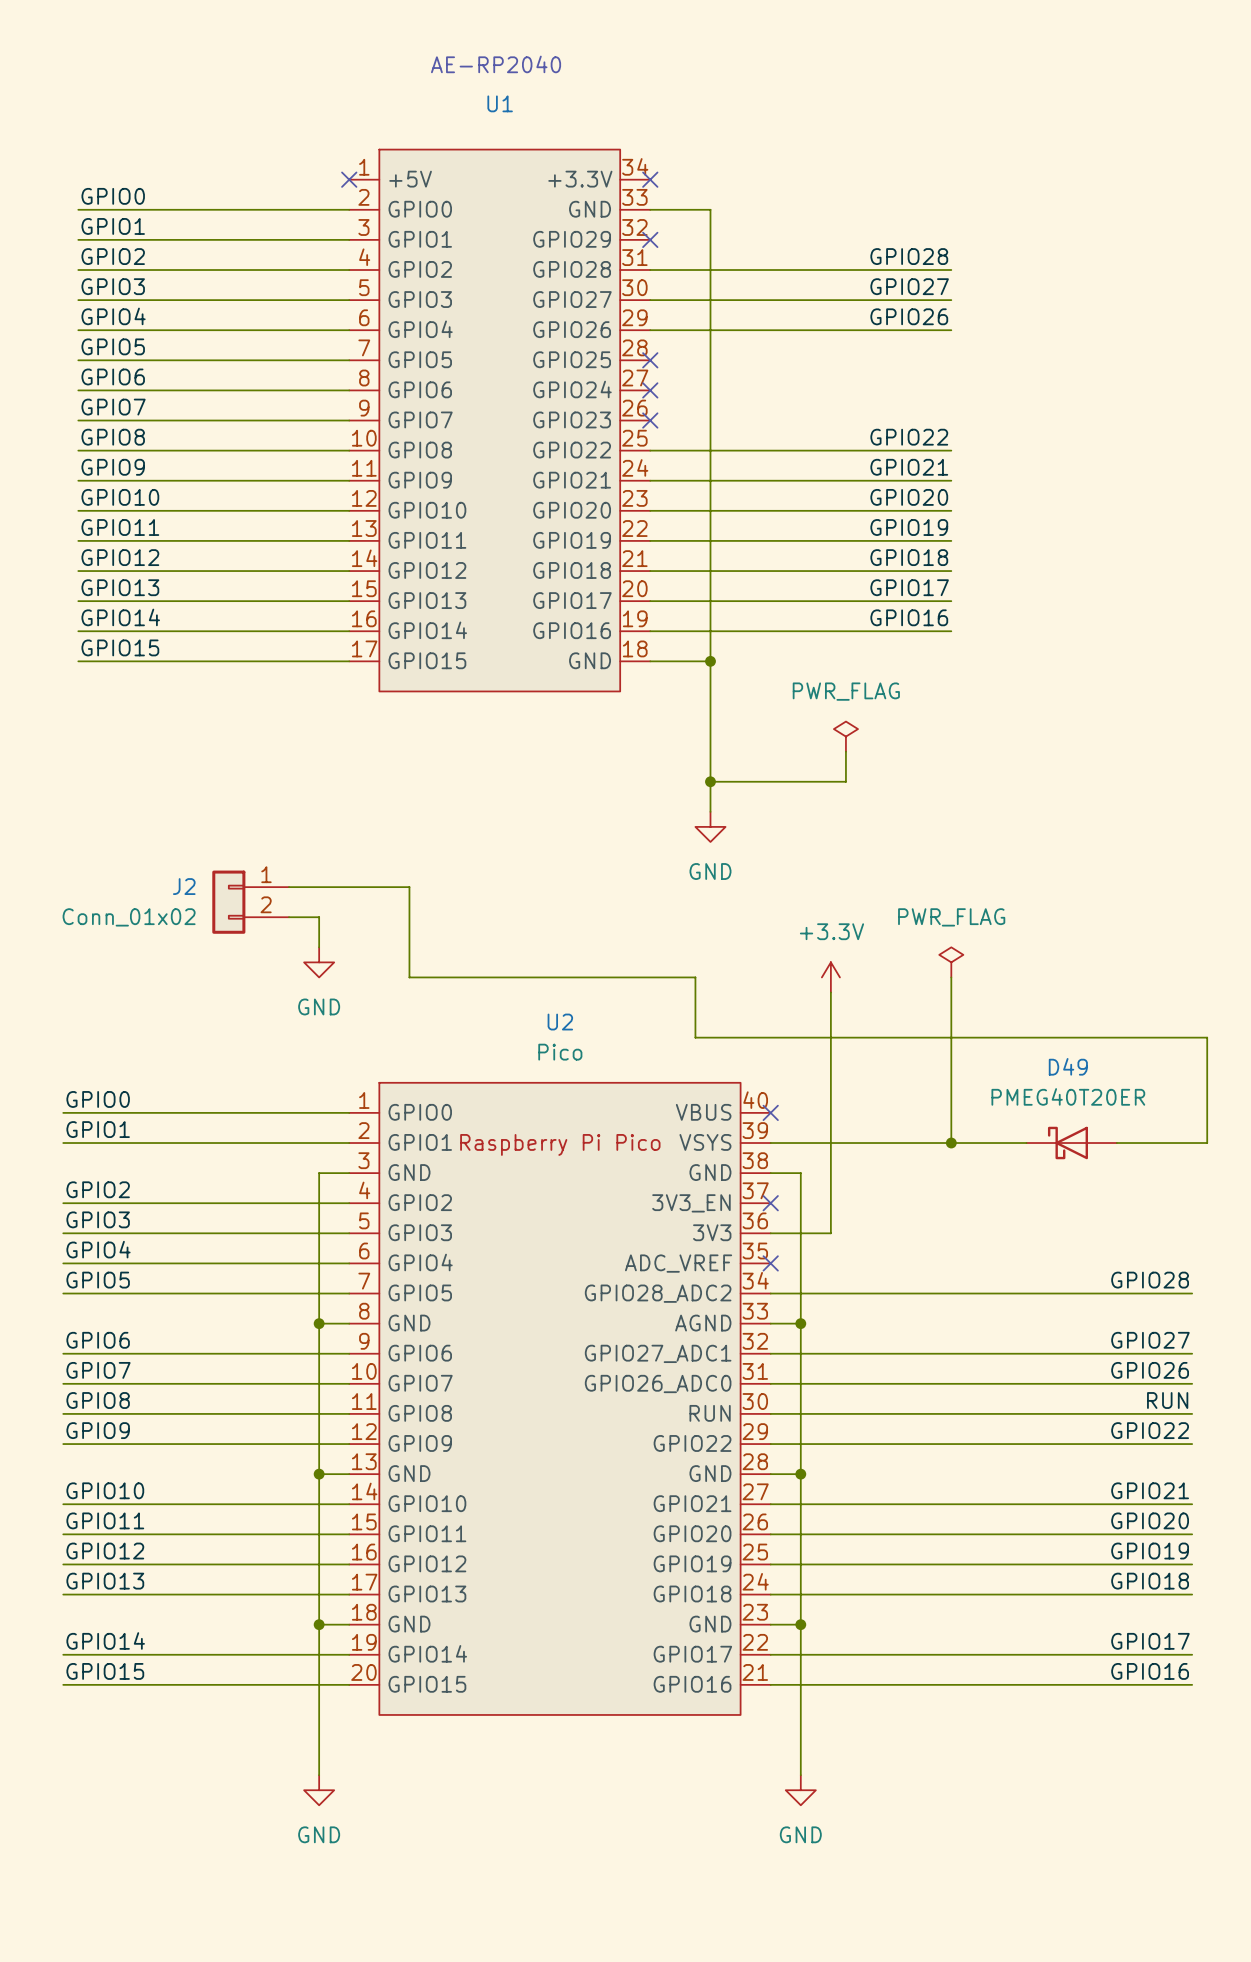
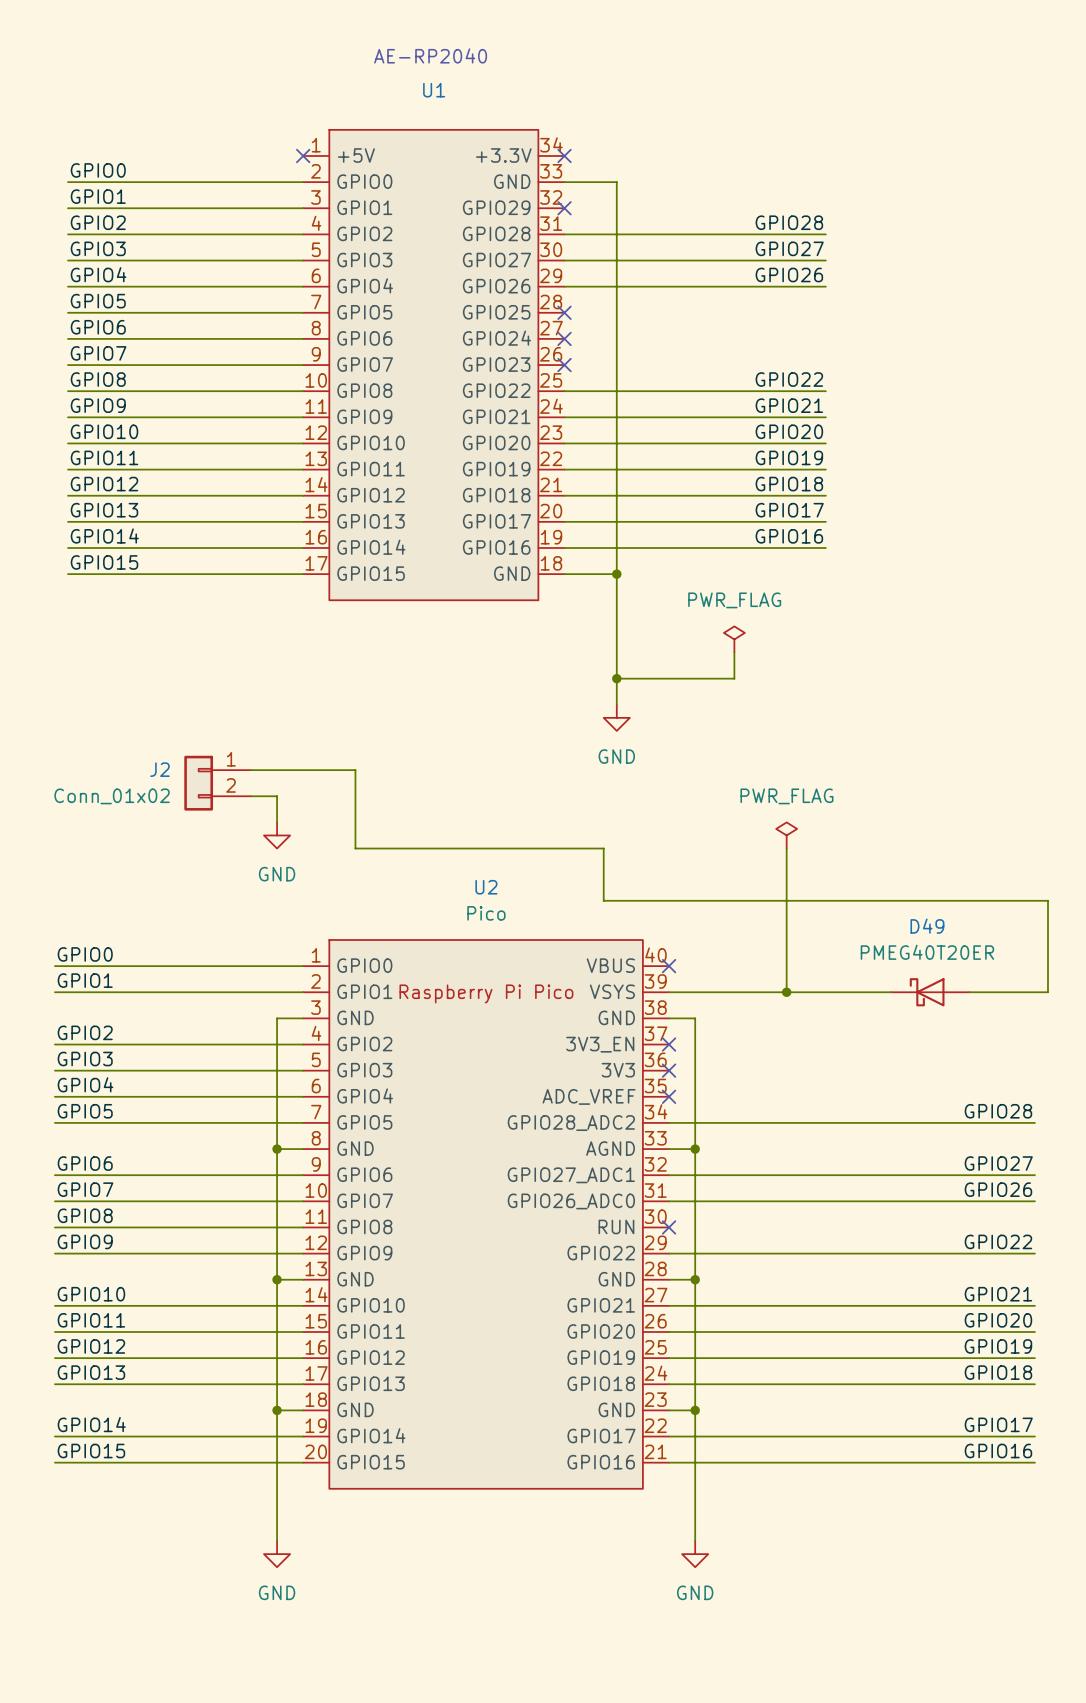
power symbol position: PWR_FLAG (951, 962) -> PWR_FLAG (786, 835)
power symbol: +3.3V (830, 977) -> none
wire: (951, 977) (951, 1143) -> (786, 848) (786, 992)
wire: (830, 992) (830, 1233) (770, 1233) -> none
junction position: (951, 1143) -> (786, 992)
no-connect mark: none -> (669, 1070)
label: RUN (1167, 1400) -> none
wire: (770, 1413) (1192, 1413) -> none
no-connect mark: none -> (669, 1227)

